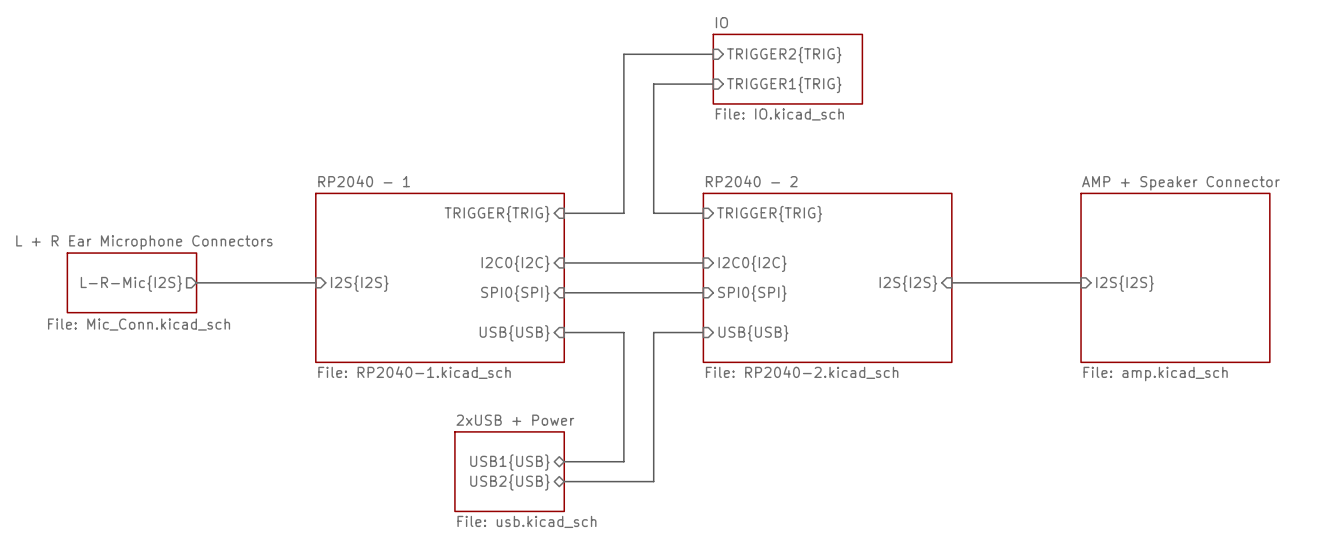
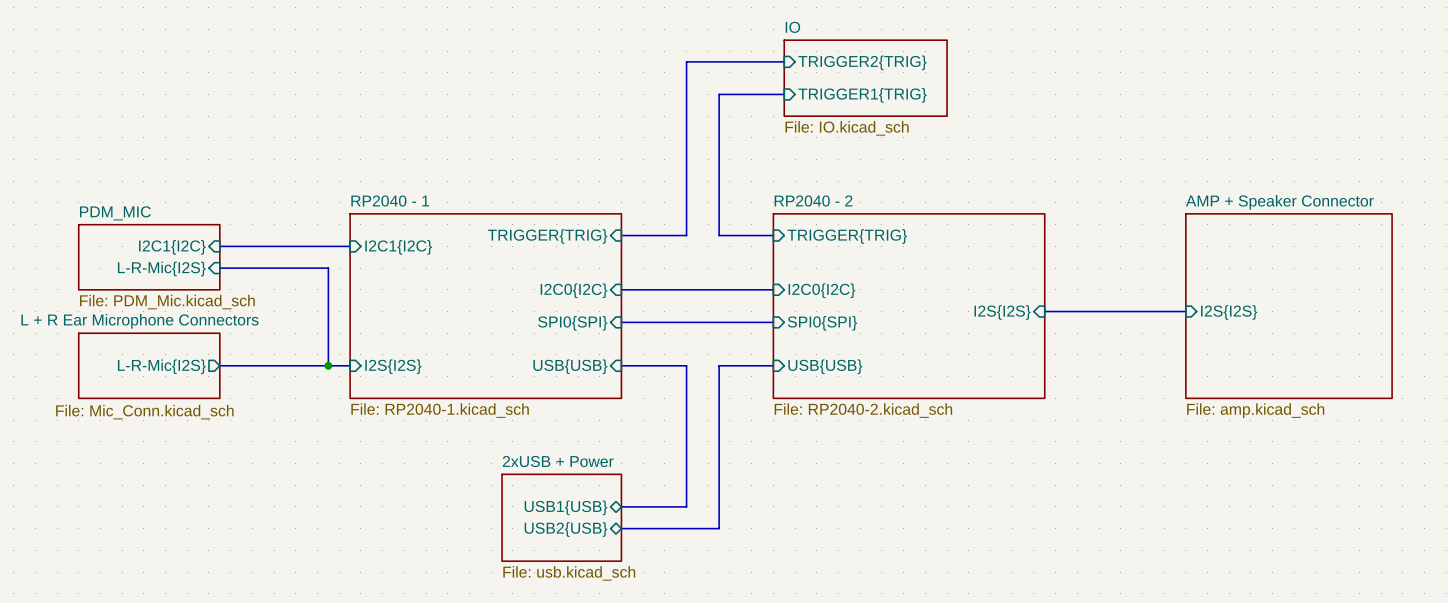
bus: none -> (219, 246) (350, 246)
sheet pin: none -> I2C1{I2C} (172, 247)
sheet pin: none -> I2C1{I2C} (398, 247)
sheet PDM_MIC: none -> File: PDM_Mic.kicad_sch (149, 257)
sheet pin: none -> L-R-Mic{I2S} (161, 269)
bus: none -> (219, 268) (328, 268) (328, 365)
sheet L + R Ear Microphone Connectors position: (131, 282) -> (149, 365)
bus: (196, 282) (315, 282) -> (219, 365) (350, 365)
sheet pin: L-R-Mic{I2S} (131, 283) -> none
sheet pin position: I2S{I2S} (359, 283) -> I2S{I2S} (393, 366)
junction: none -> (328, 365)
sheet pin: none -> L-R-Mic{I2S} (161, 366)

